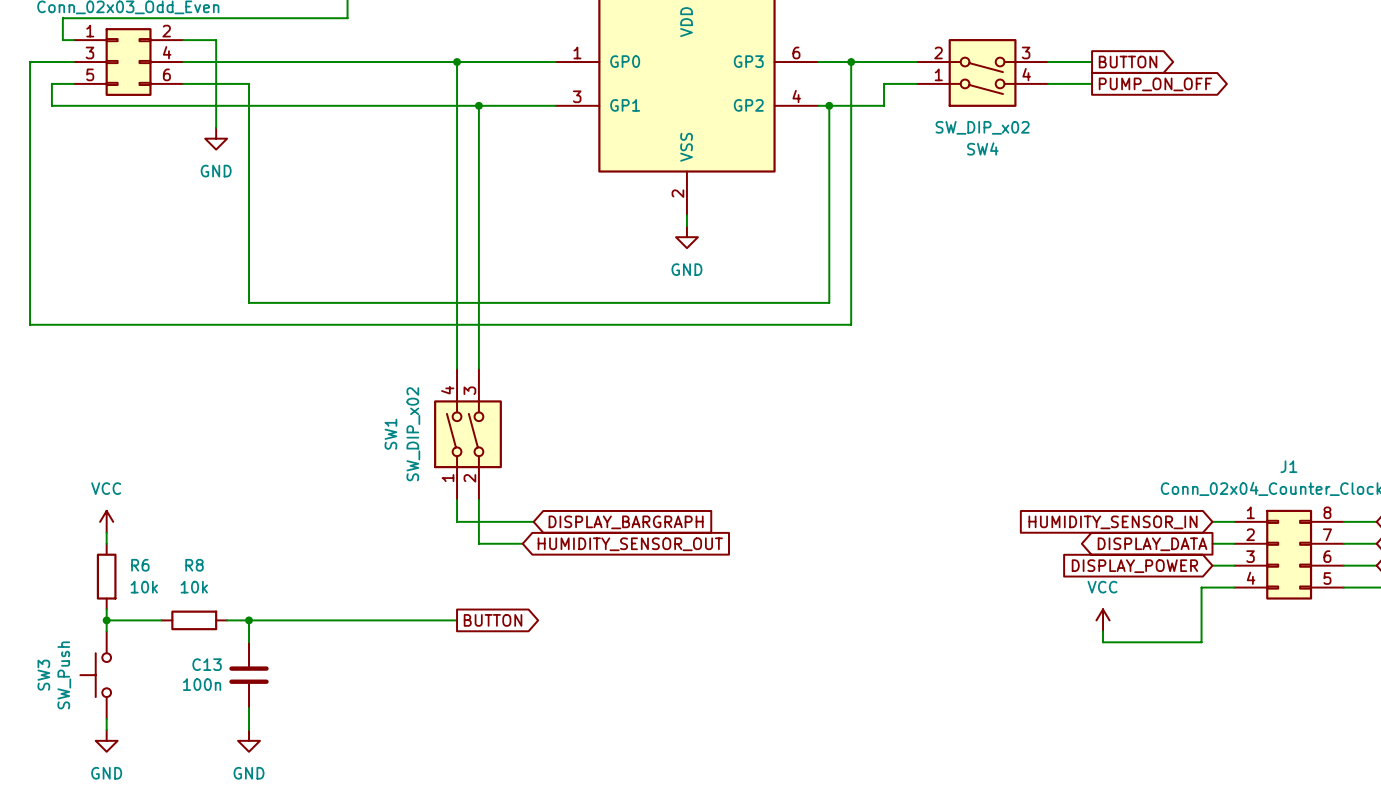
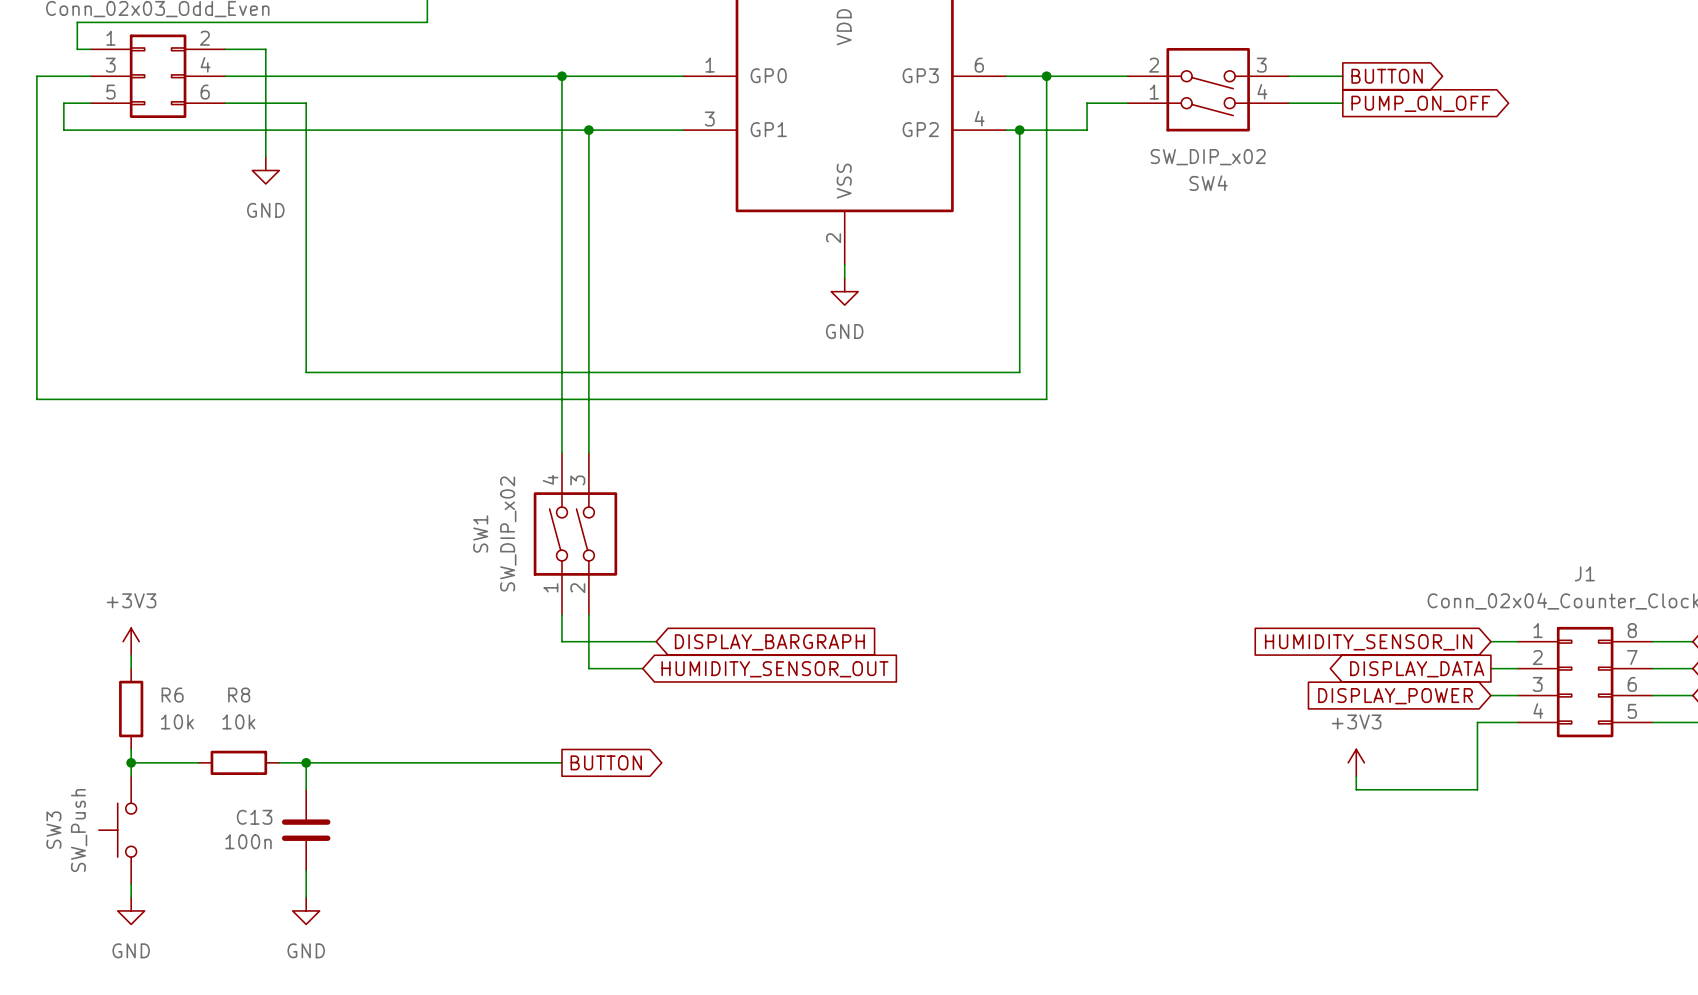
power symbol: VCC (106, 521) -> +3V3 (131, 641)
power symbol: VCC (1103, 620) -> +3V3 (1356, 762)

